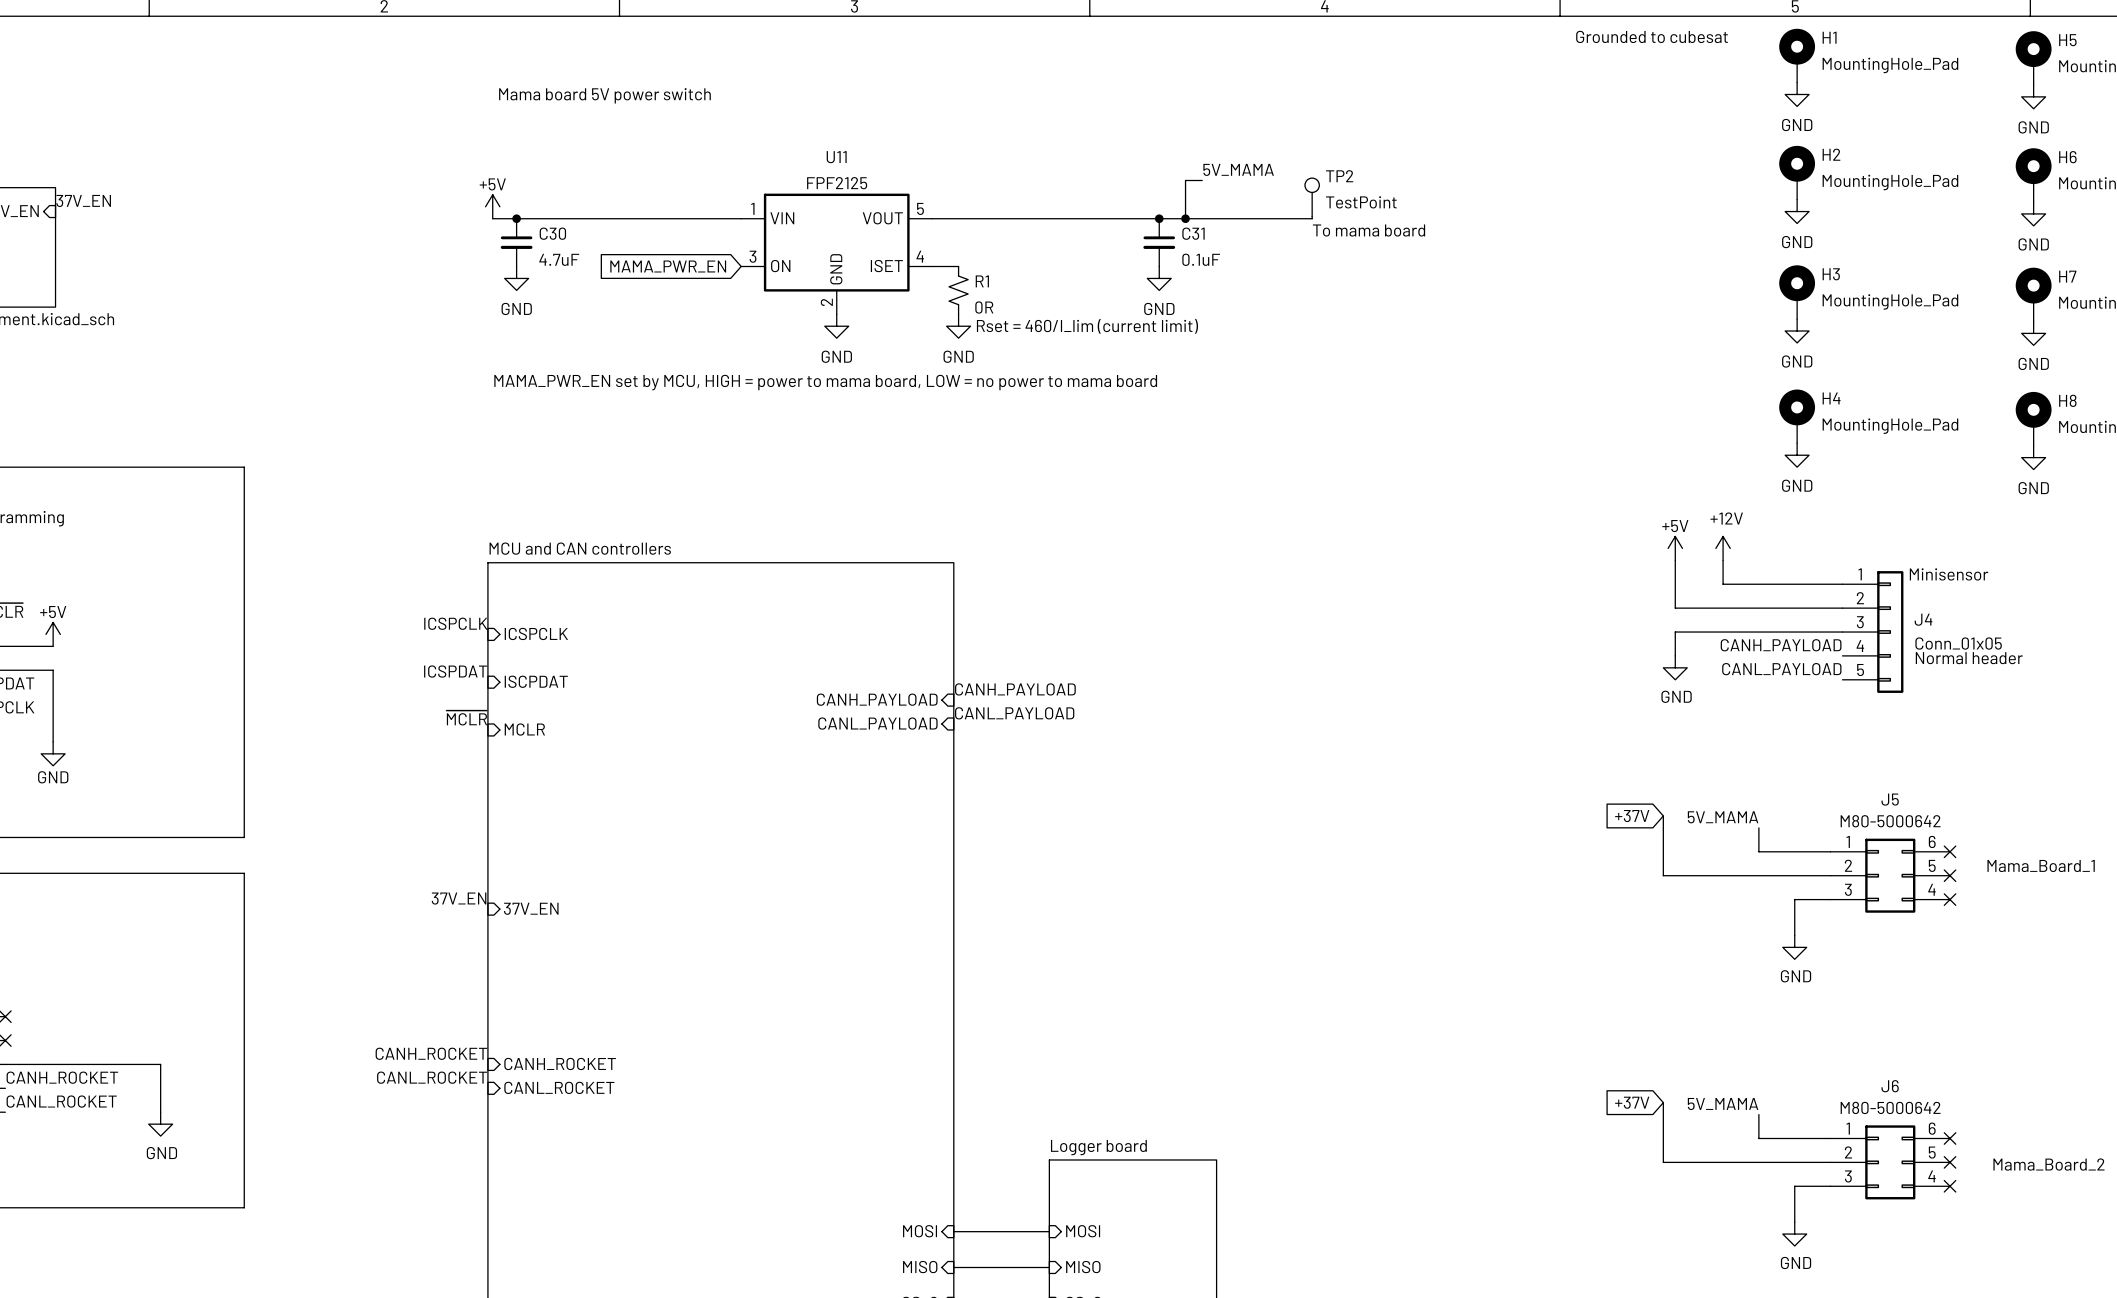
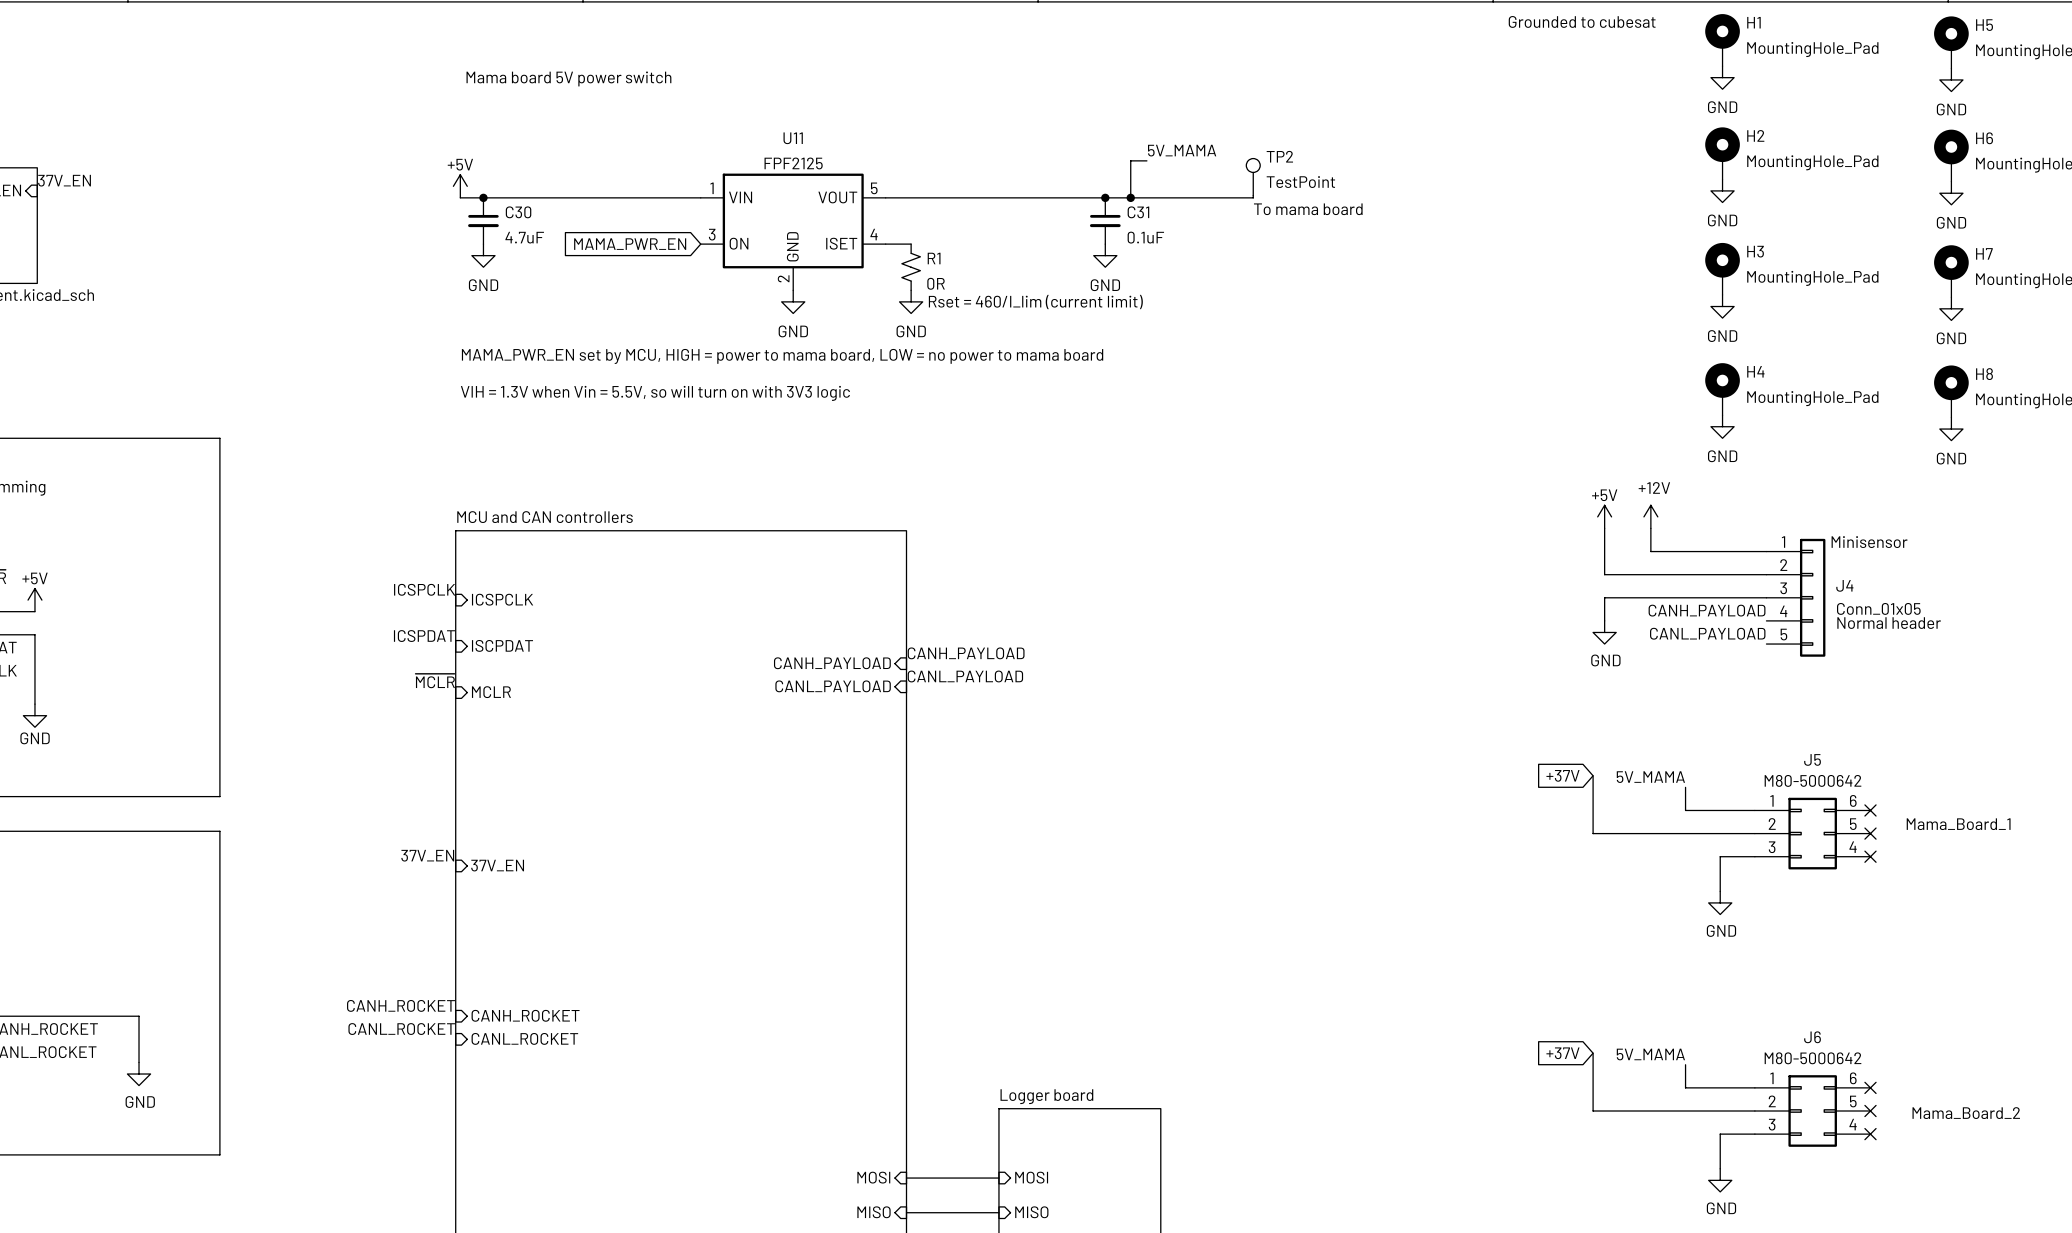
text: none -> VIH = 1.3V when Vin = 5.5V, so will turn on with 3V3 logic (655, 393)

